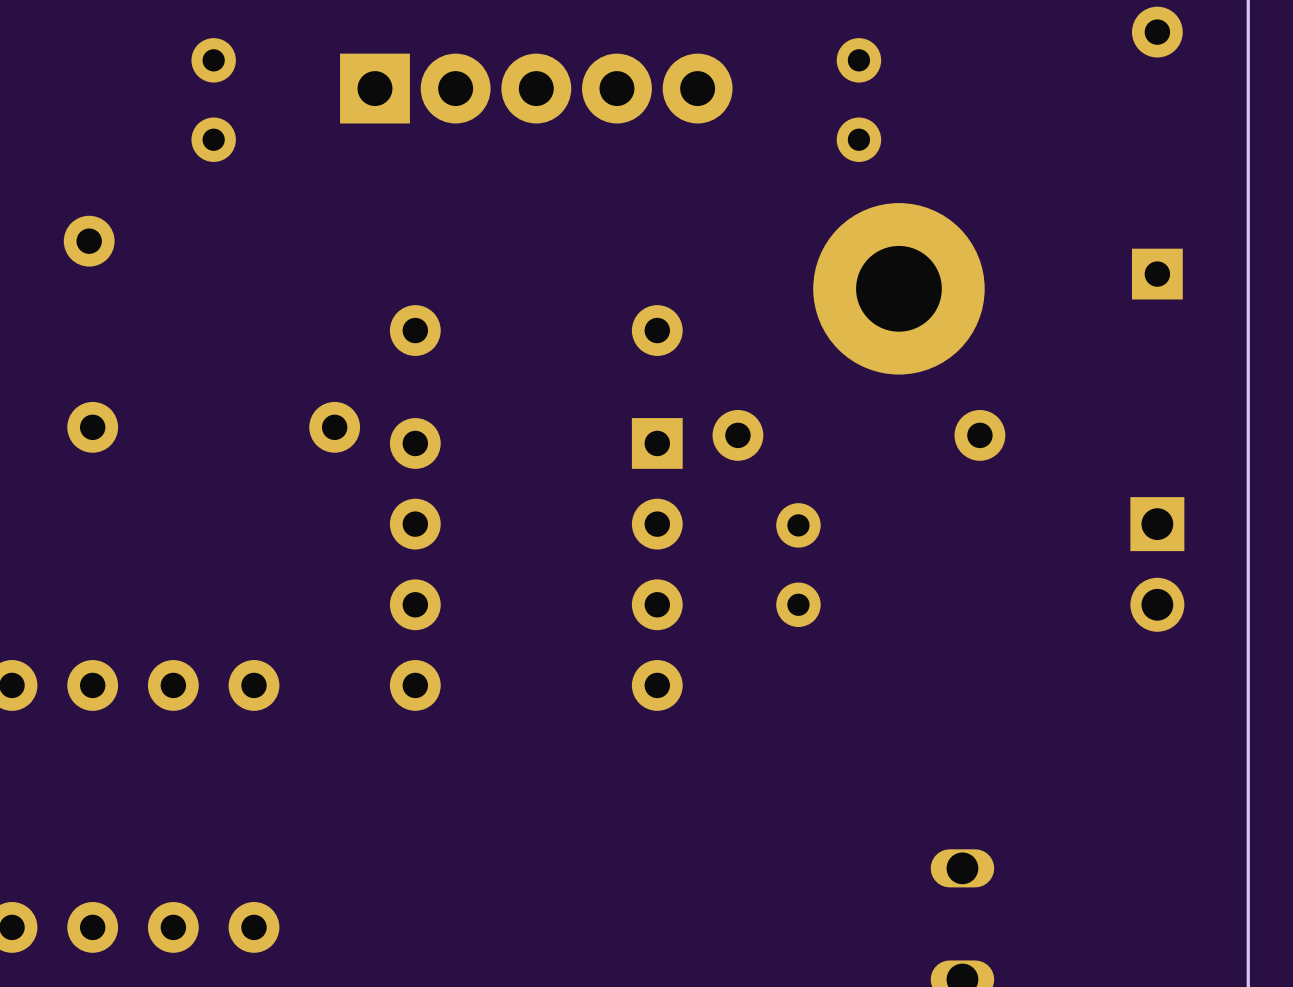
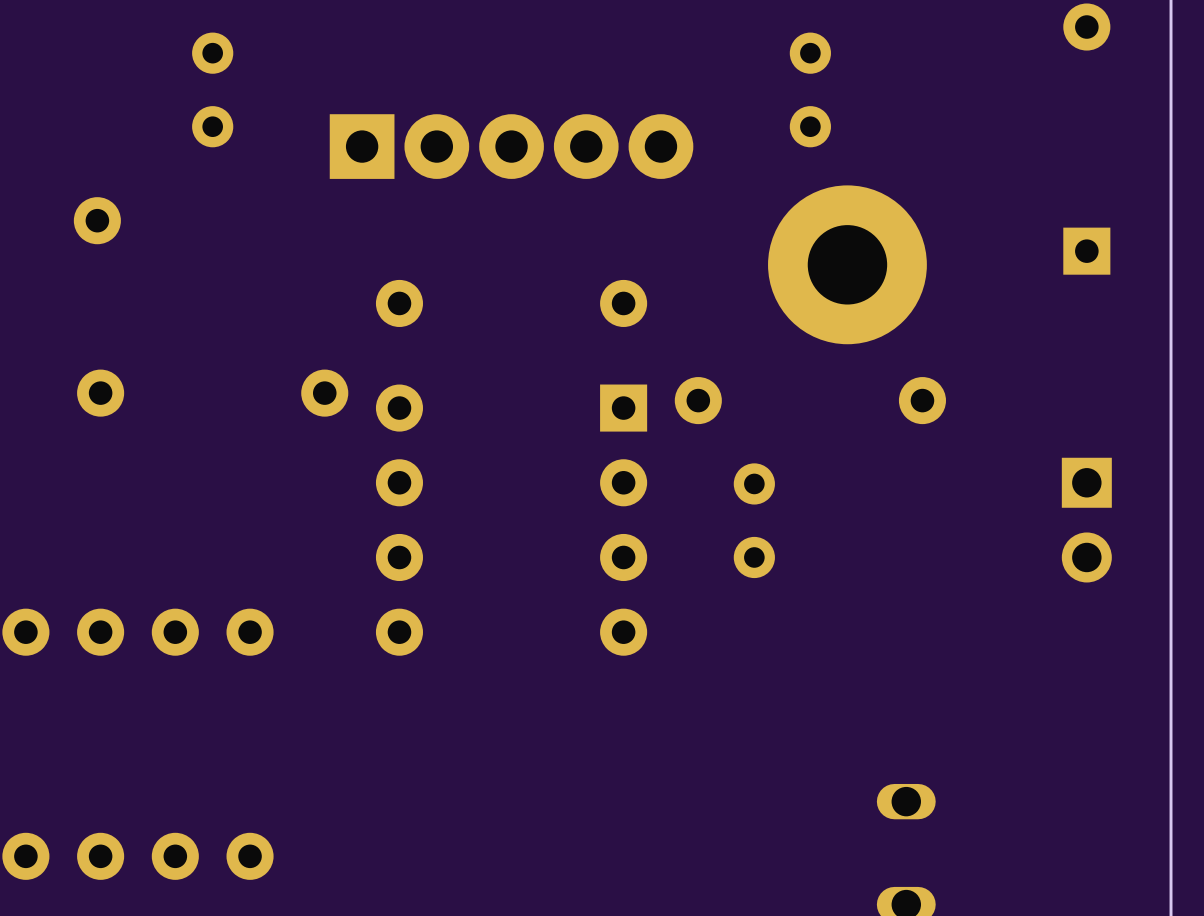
part position: (536, 88) -> (511, 146)

